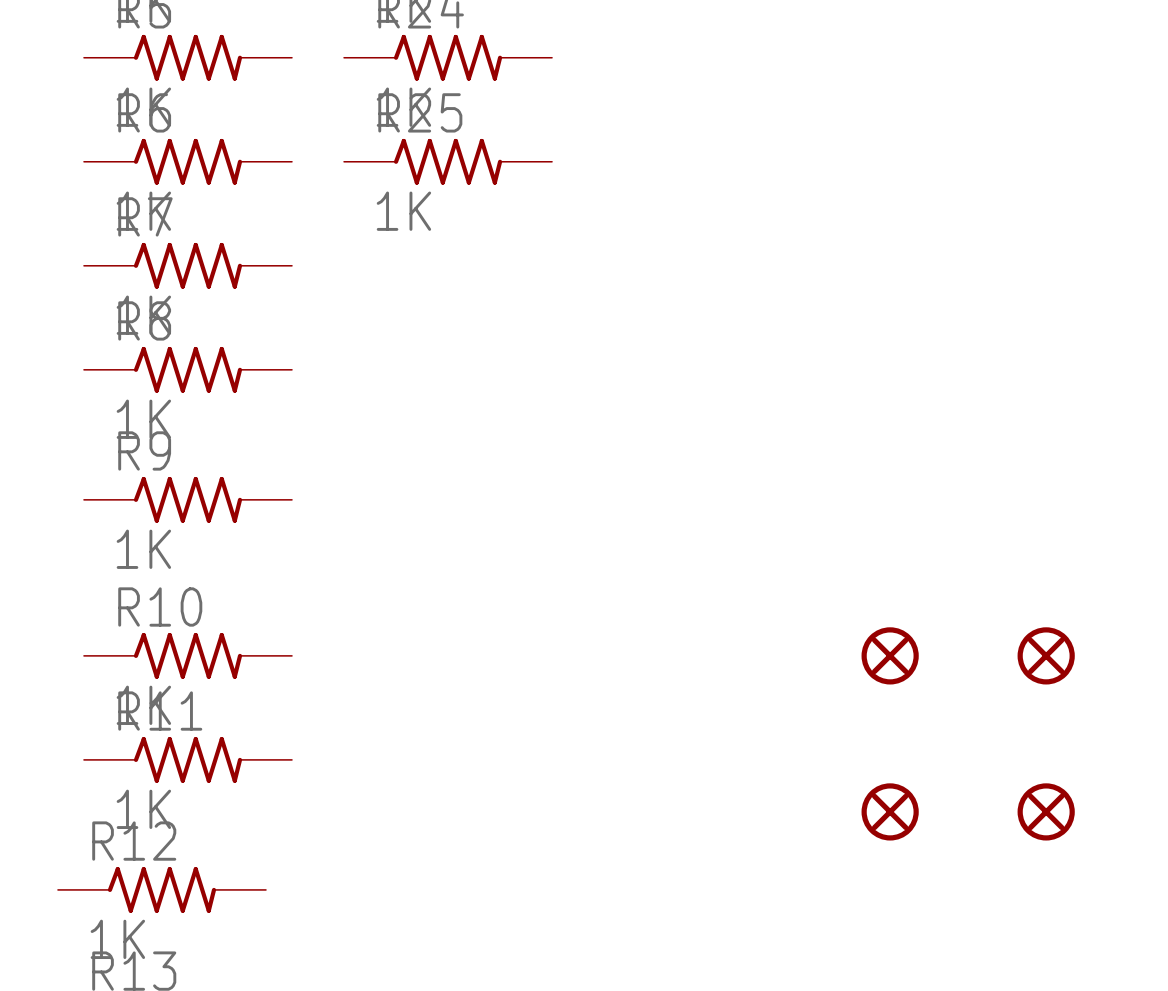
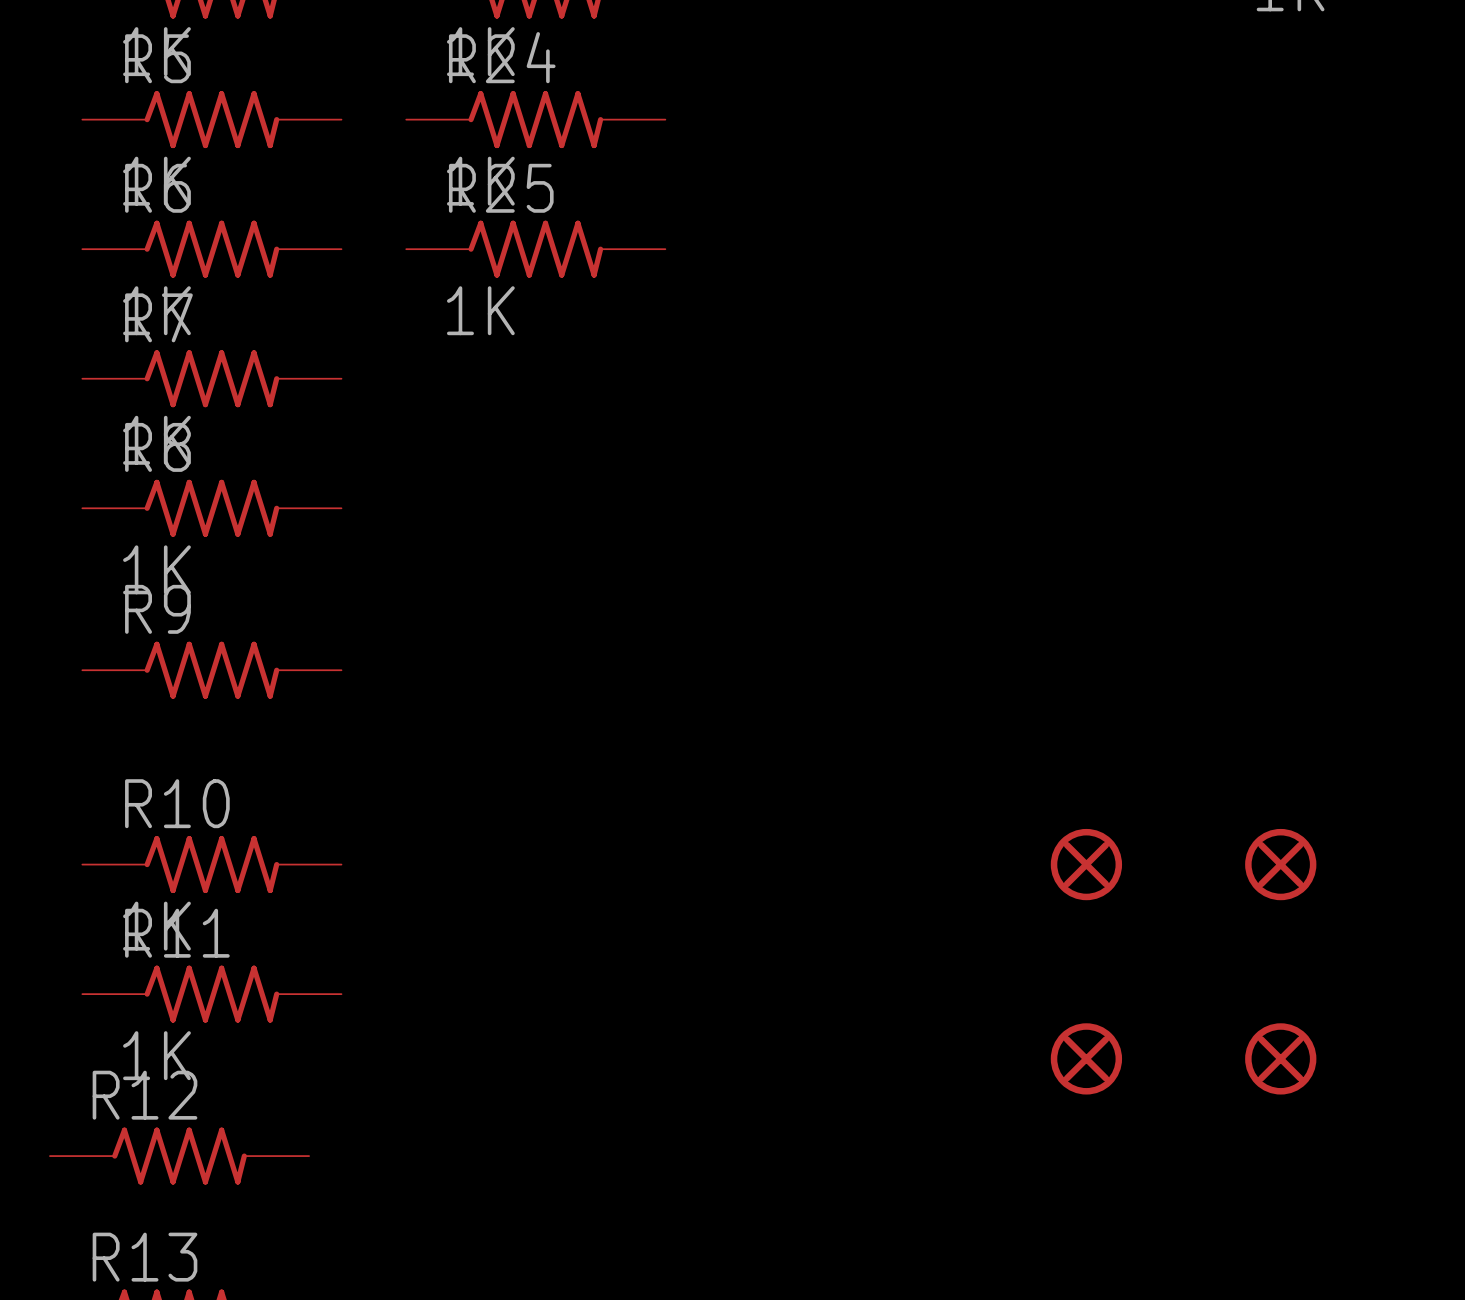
R9 value: 1K (143, 549) -> none
R12 value: 1K (117, 939) -> none

